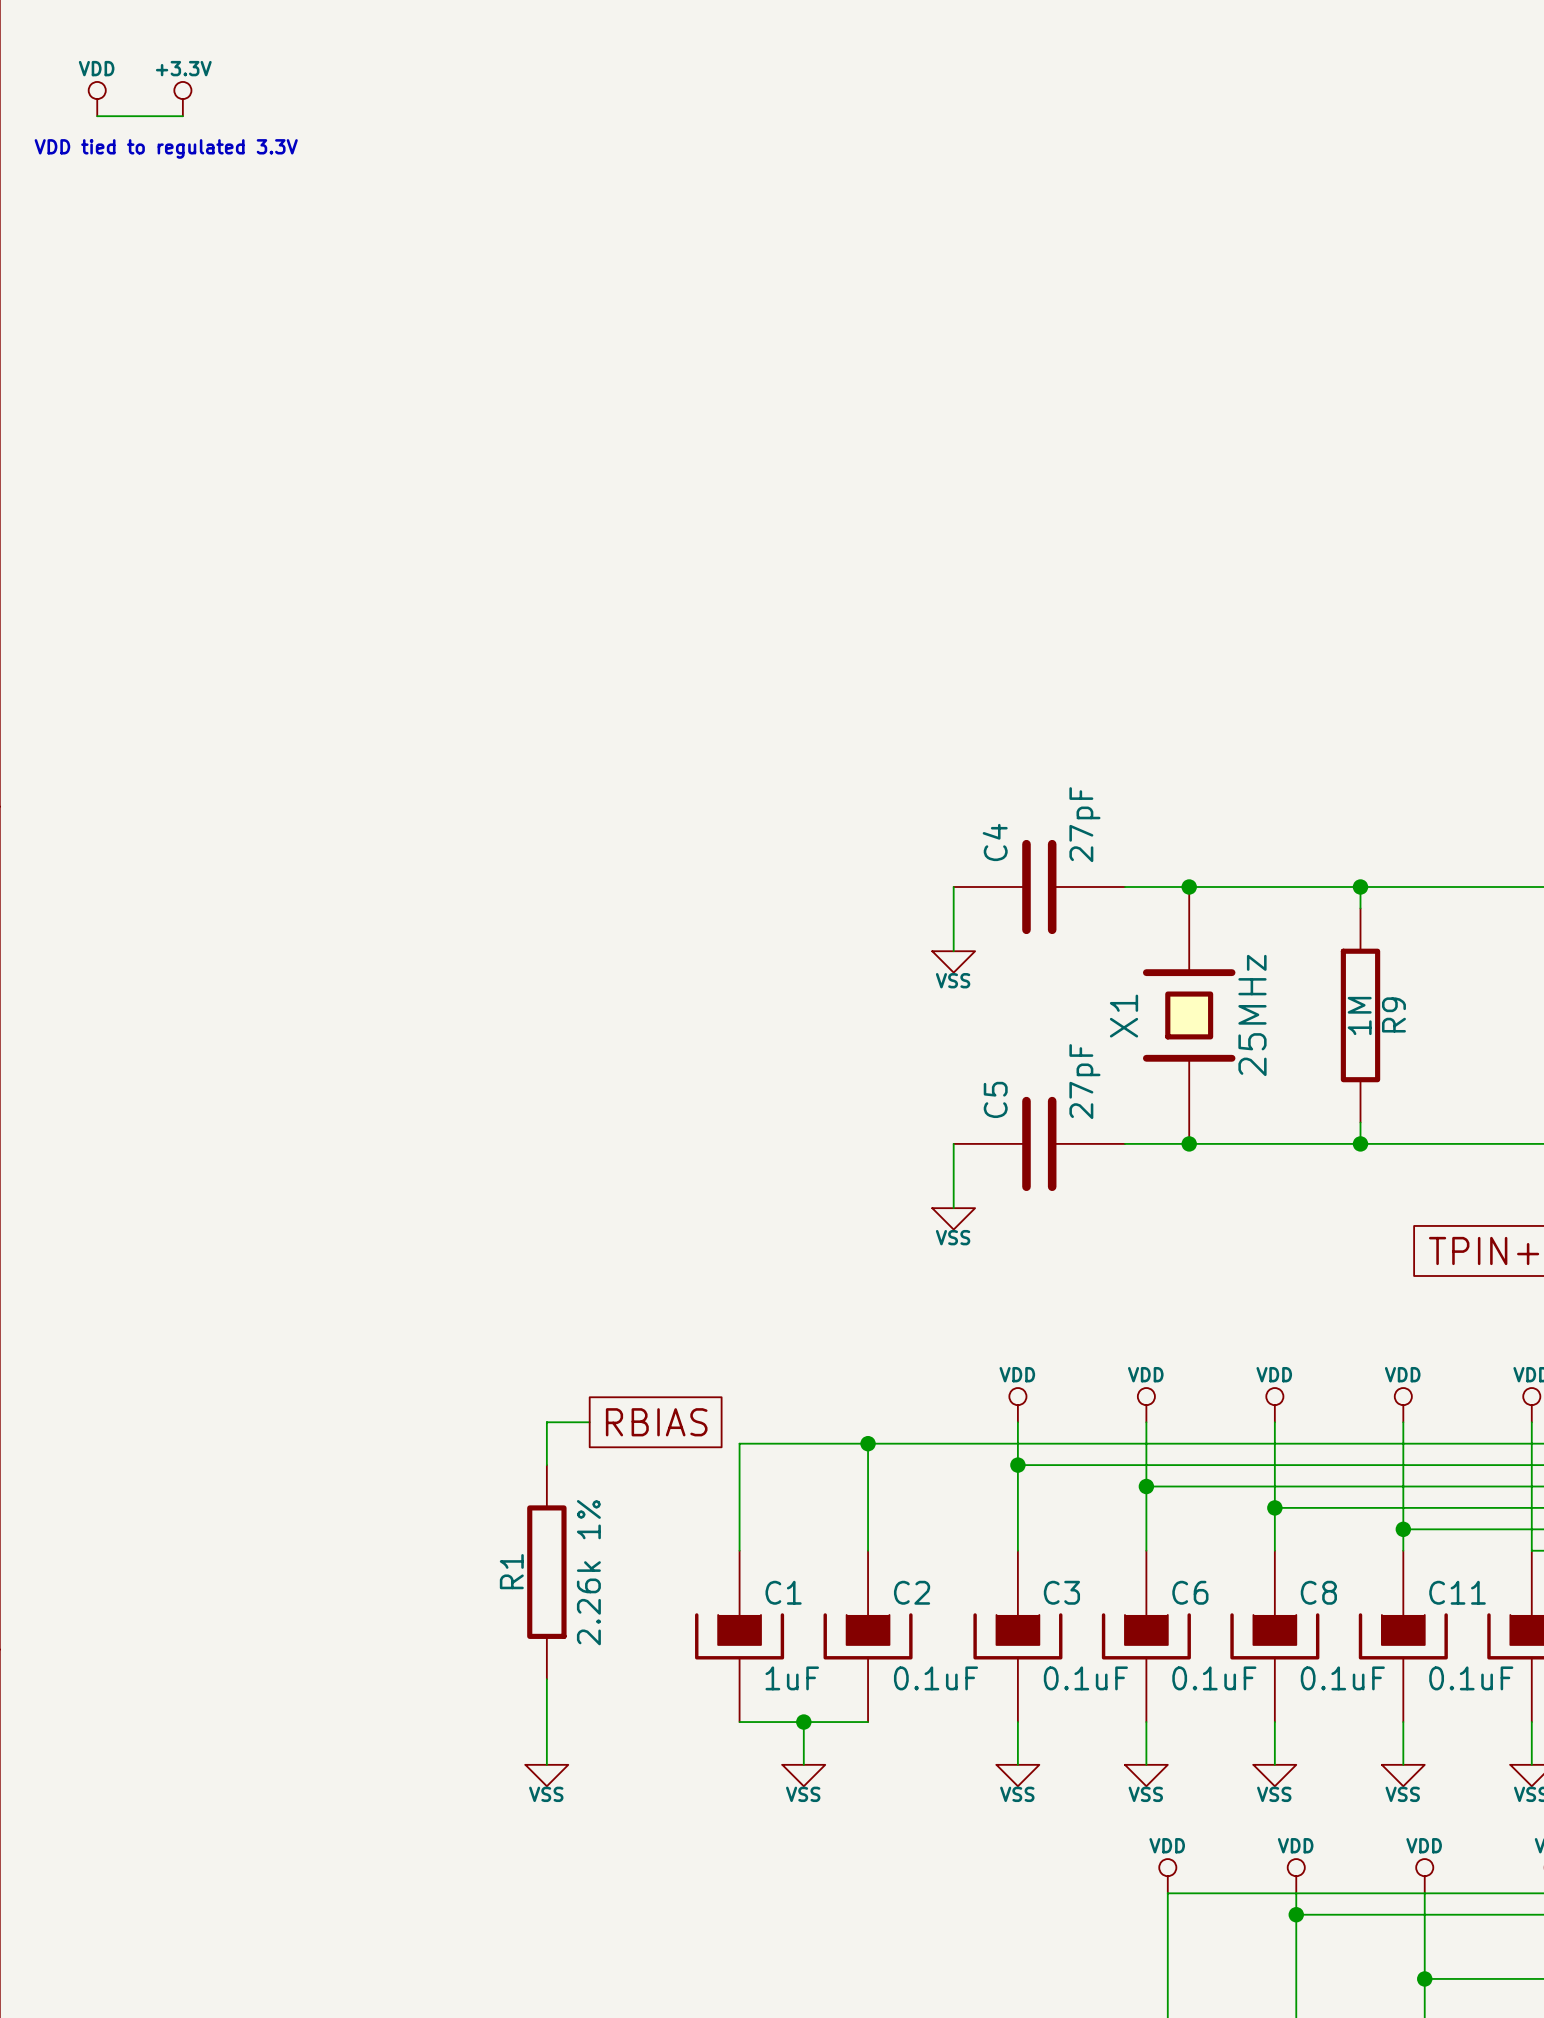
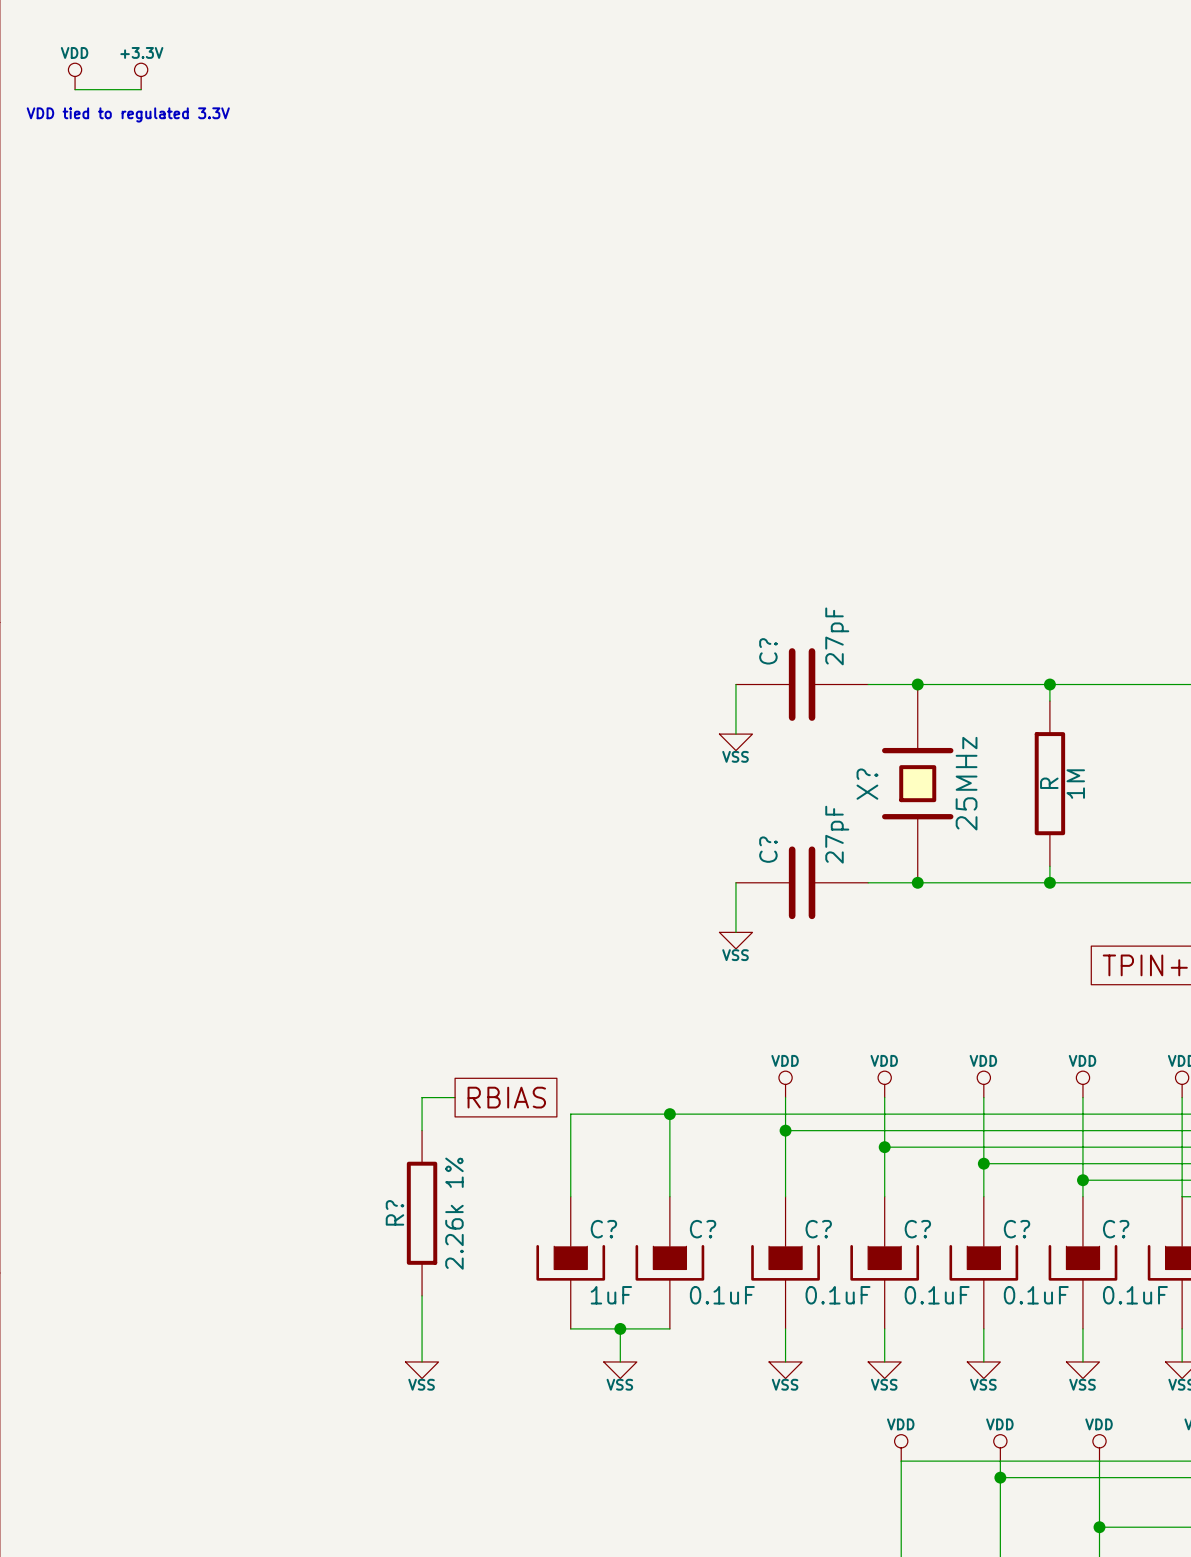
C4 name: C4 (995, 842) -> C? (768, 651)
R9 name: R9 (1393, 1014) -> 1M (1075, 784)
R9 value: 1M (1359, 1015) -> R (1049, 783)
X1 name: X1 (1124, 1016) -> X? (867, 784)
C5 name: C5 (995, 1099) -> C? (768, 849)
R1 name: R1 (511, 1571) -> R? (394, 1212)
C1 name: C1 (783, 1592) -> C? (603, 1229)
C2 name: C2 (912, 1592) -> C? (703, 1229)
C3 name: C3 (1061, 1592) -> C? (818, 1229)
C6 name: C6 (1190, 1592) -> C? (917, 1229)
C8 name: C8 (1318, 1592) -> C? (1017, 1229)
C11 name: C11 (1457, 1592) -> C? (1116, 1229)

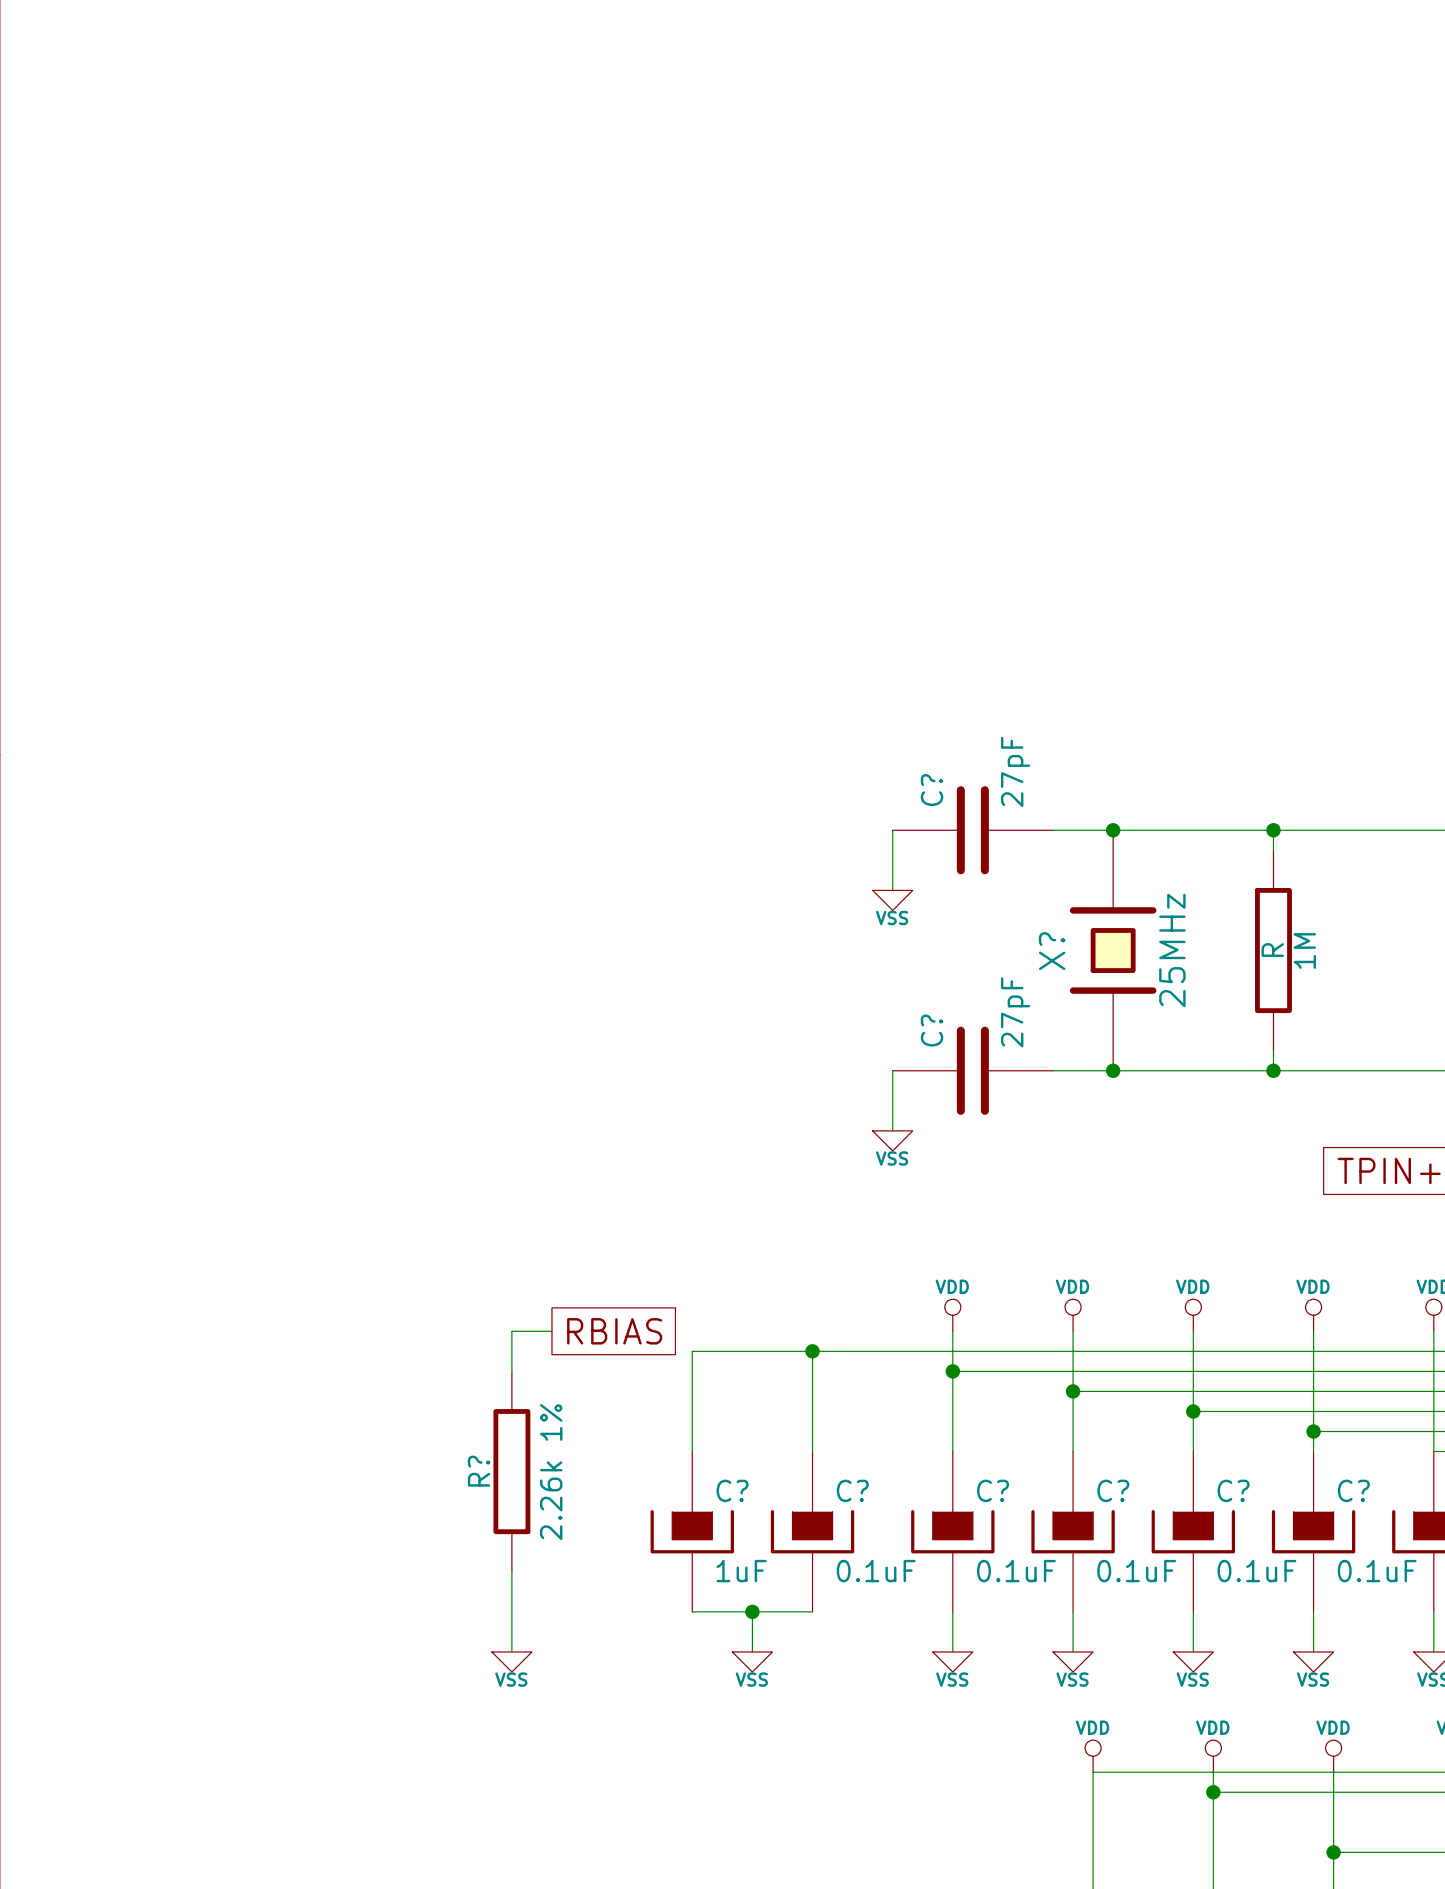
power symbol: VDD (75, 76) -> none
power symbol: +3.3V (141, 76) -> none
wire: (75, 89) (141, 89) -> none
text: VDD tied to regulated 3.3V (128, 114) -> none

